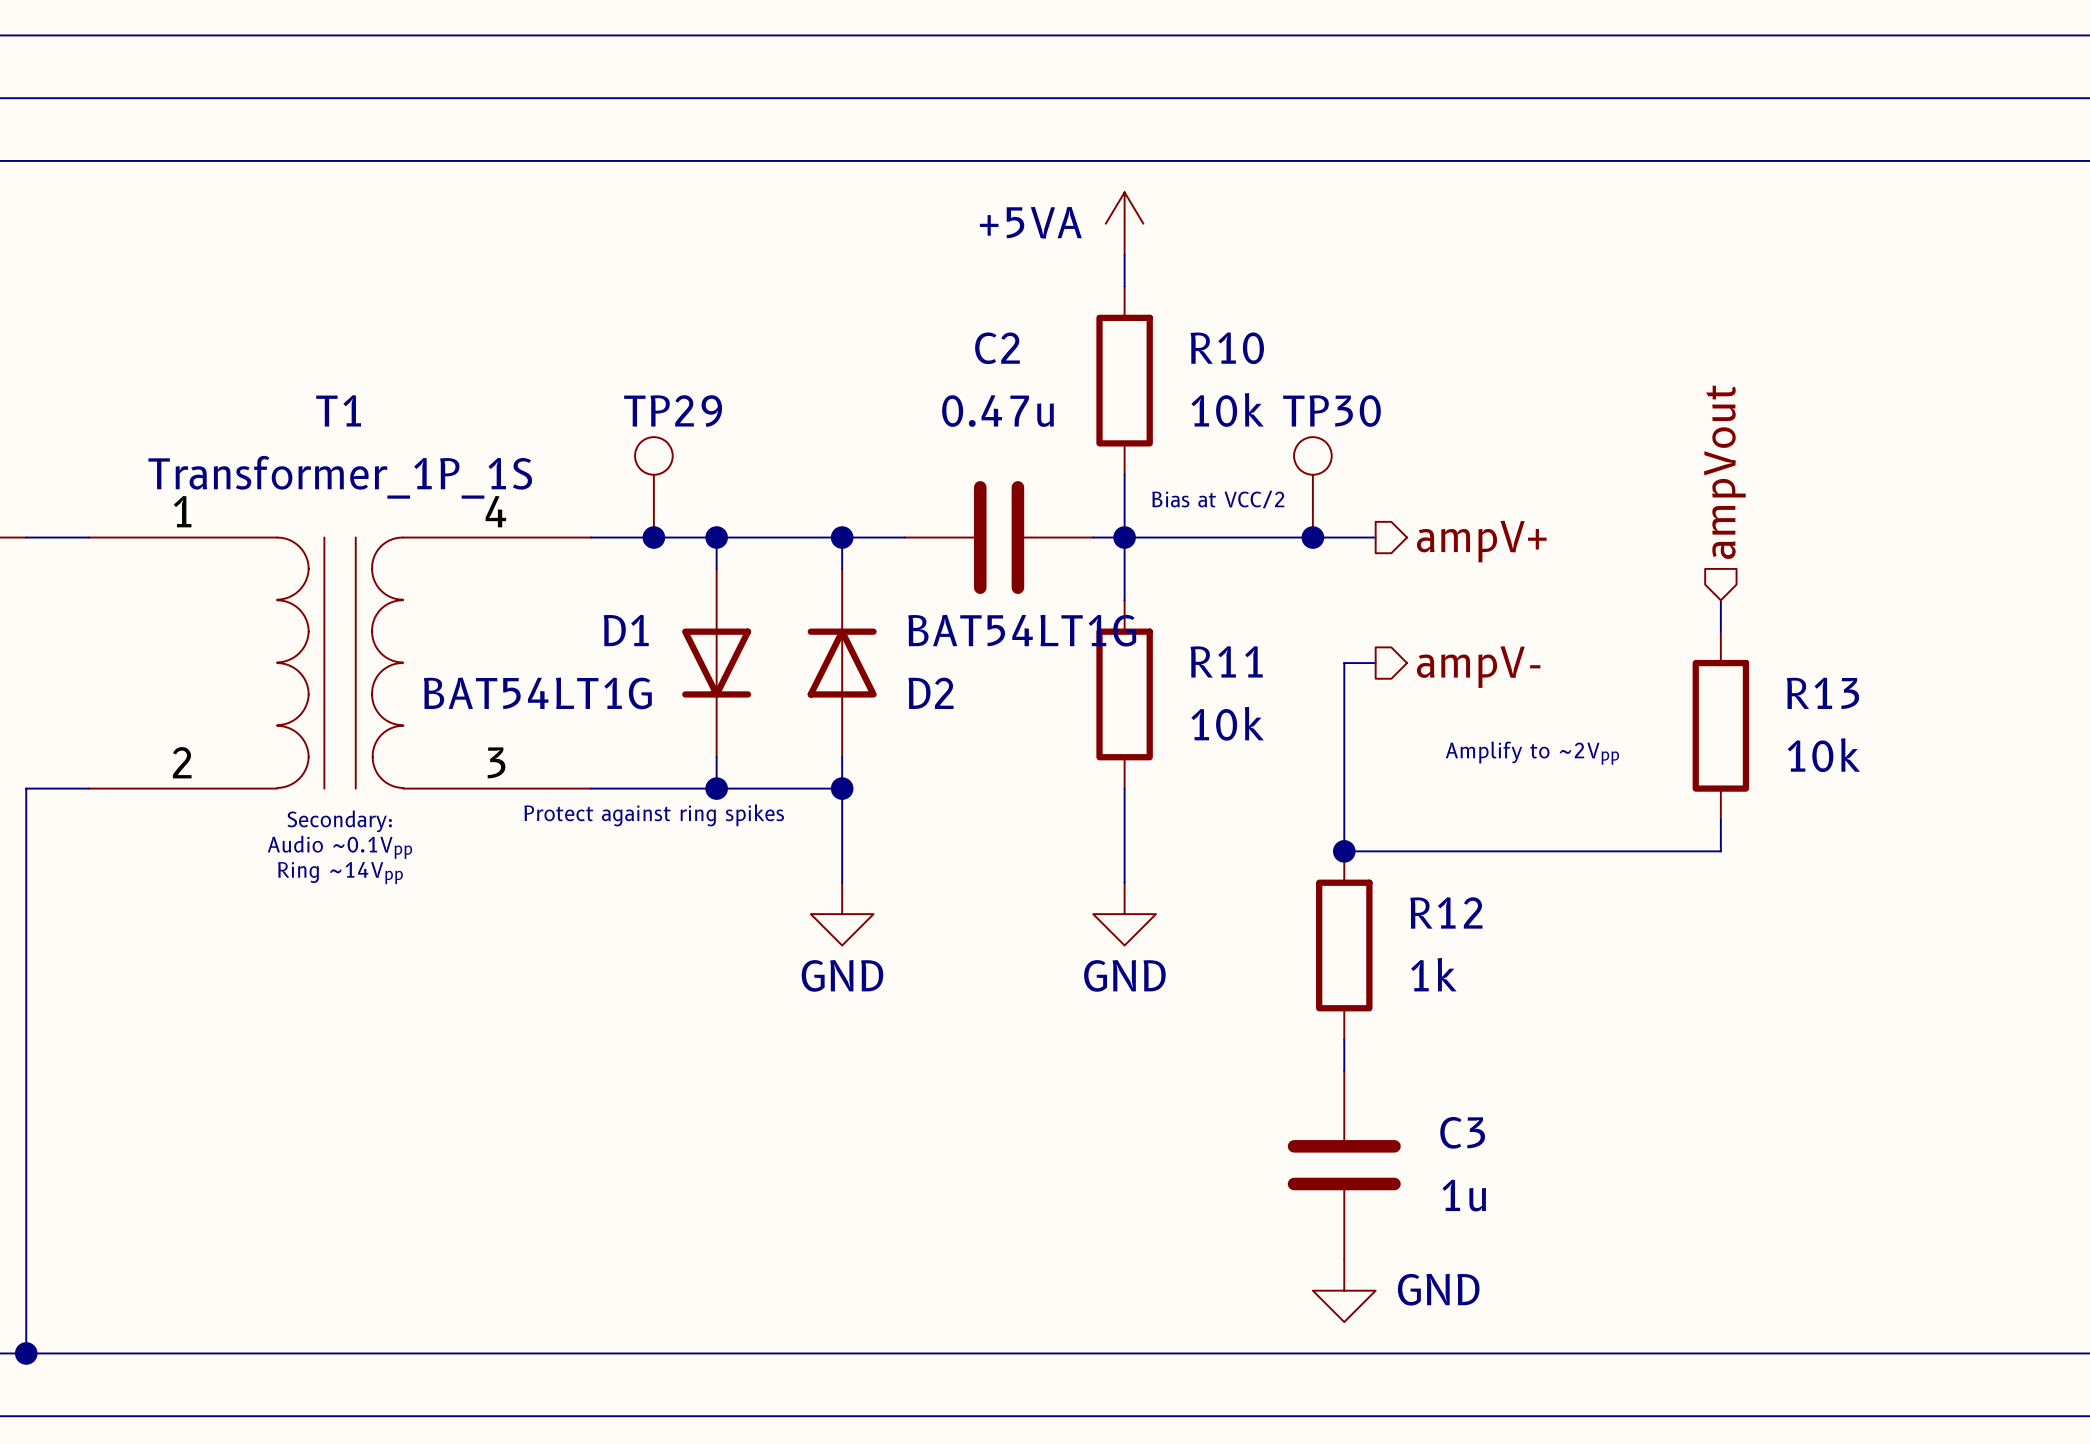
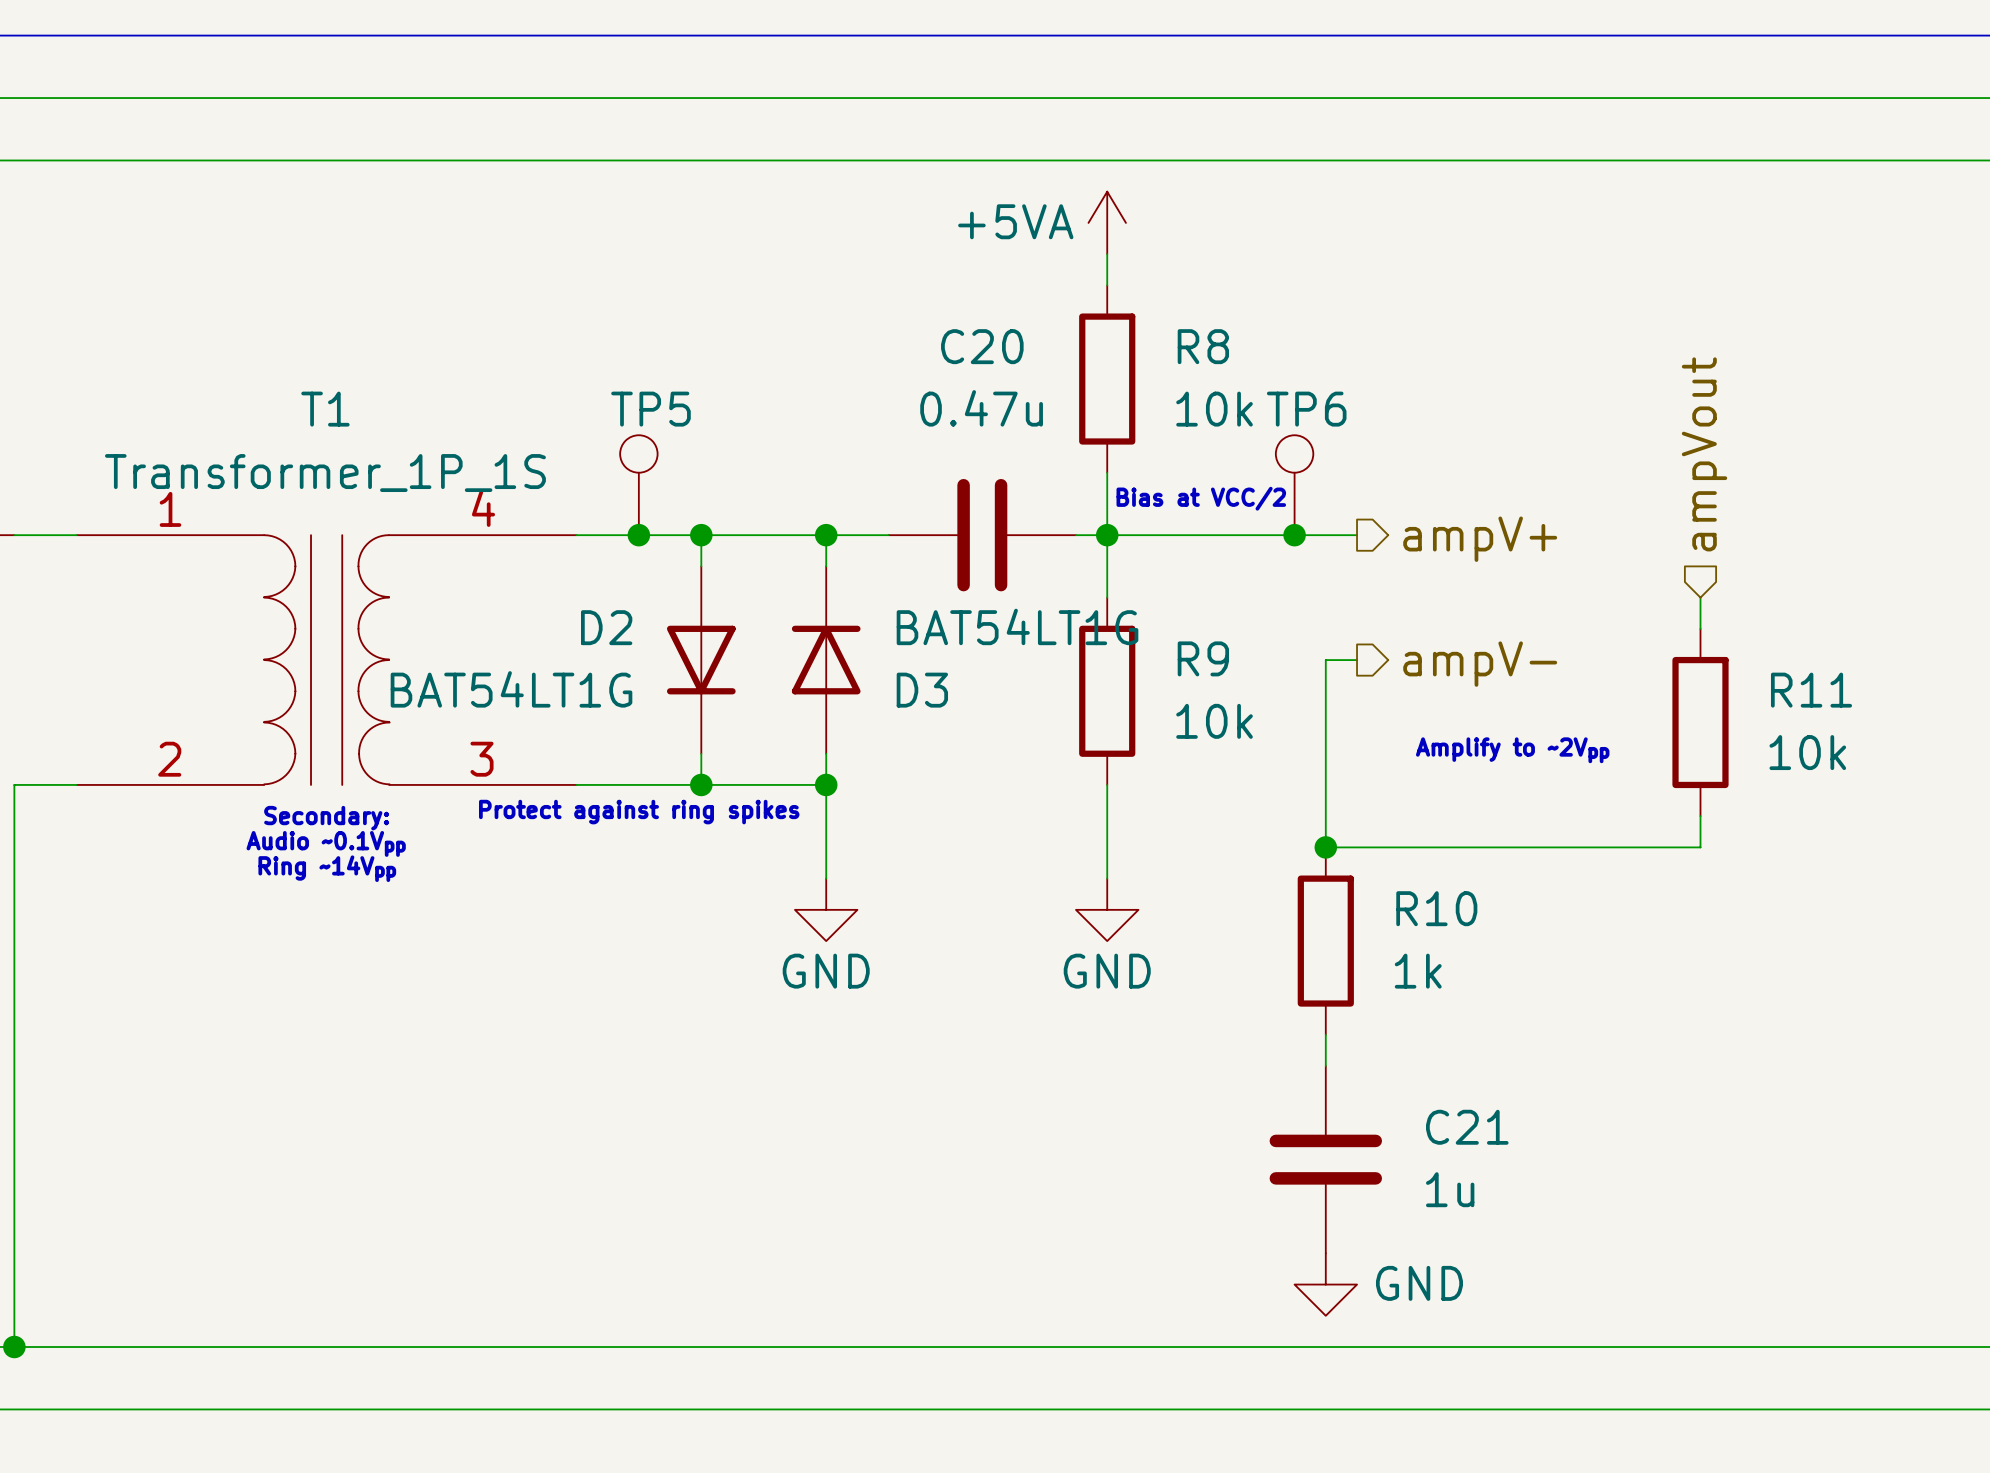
C2 name: C2 (997, 348) -> C20 (982, 346)
R10 name: R10 (1227, 348) -> R8 (1203, 346)
TP29 name: TP29 (673, 411) -> TP5 (650, 409)
TP30 name: TP30 (1331, 411) -> TP6 (1306, 409)
D1 name: D1 (626, 630) -> D2 (606, 627)
R11 name: R11 (1226, 661) -> R9 (1203, 658)
D2 name: D2 (931, 693) -> D3 (922, 690)
R13 name: R13 (1822, 693) -> R11 (1811, 690)
R12 name: R12 (1446, 912) -> R10 (1436, 908)
C3 name: C3 (1462, 1132) -> C21 (1467, 1127)

